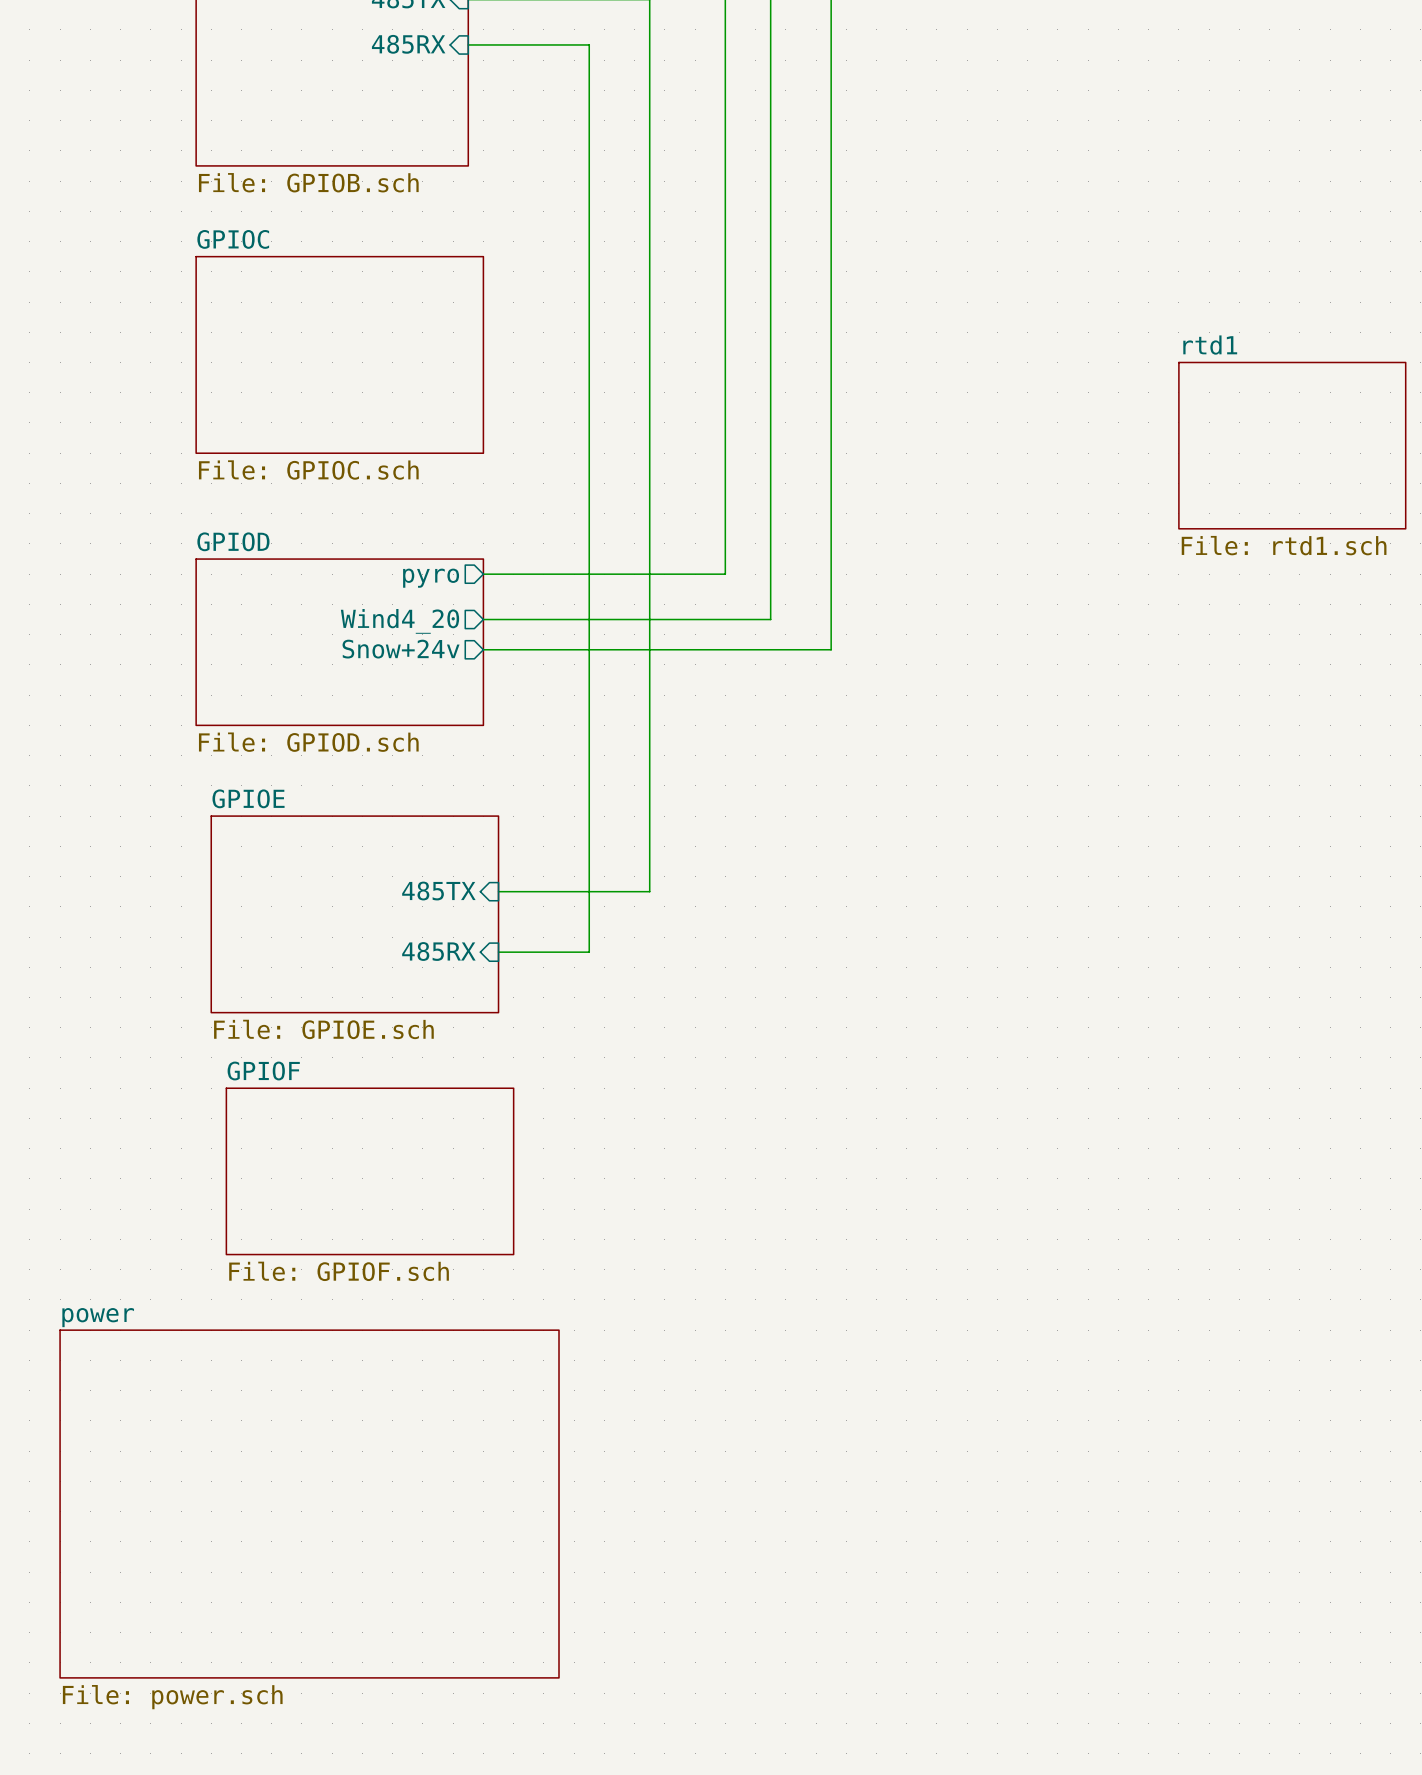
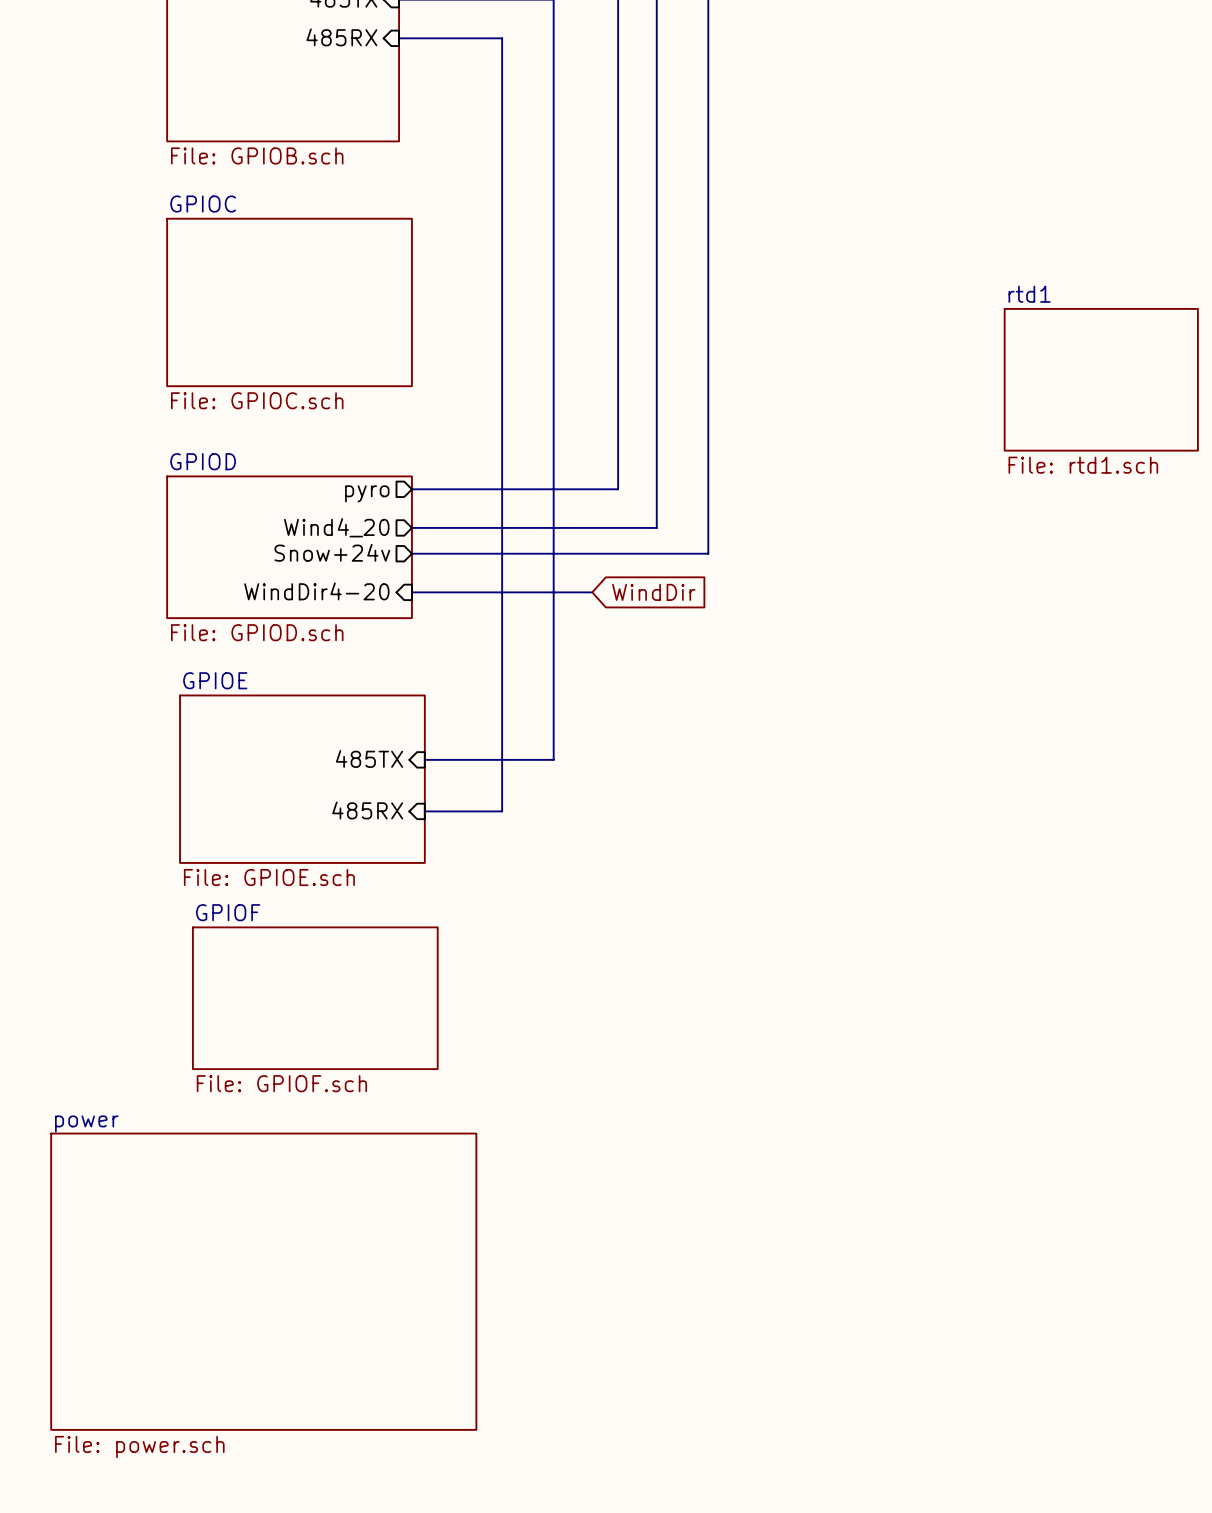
sheet pin: none -> WindDir4-20 (316, 591)
global label: none -> WindDir (653, 592)
wire: none -> (411, 592) (592, 592)

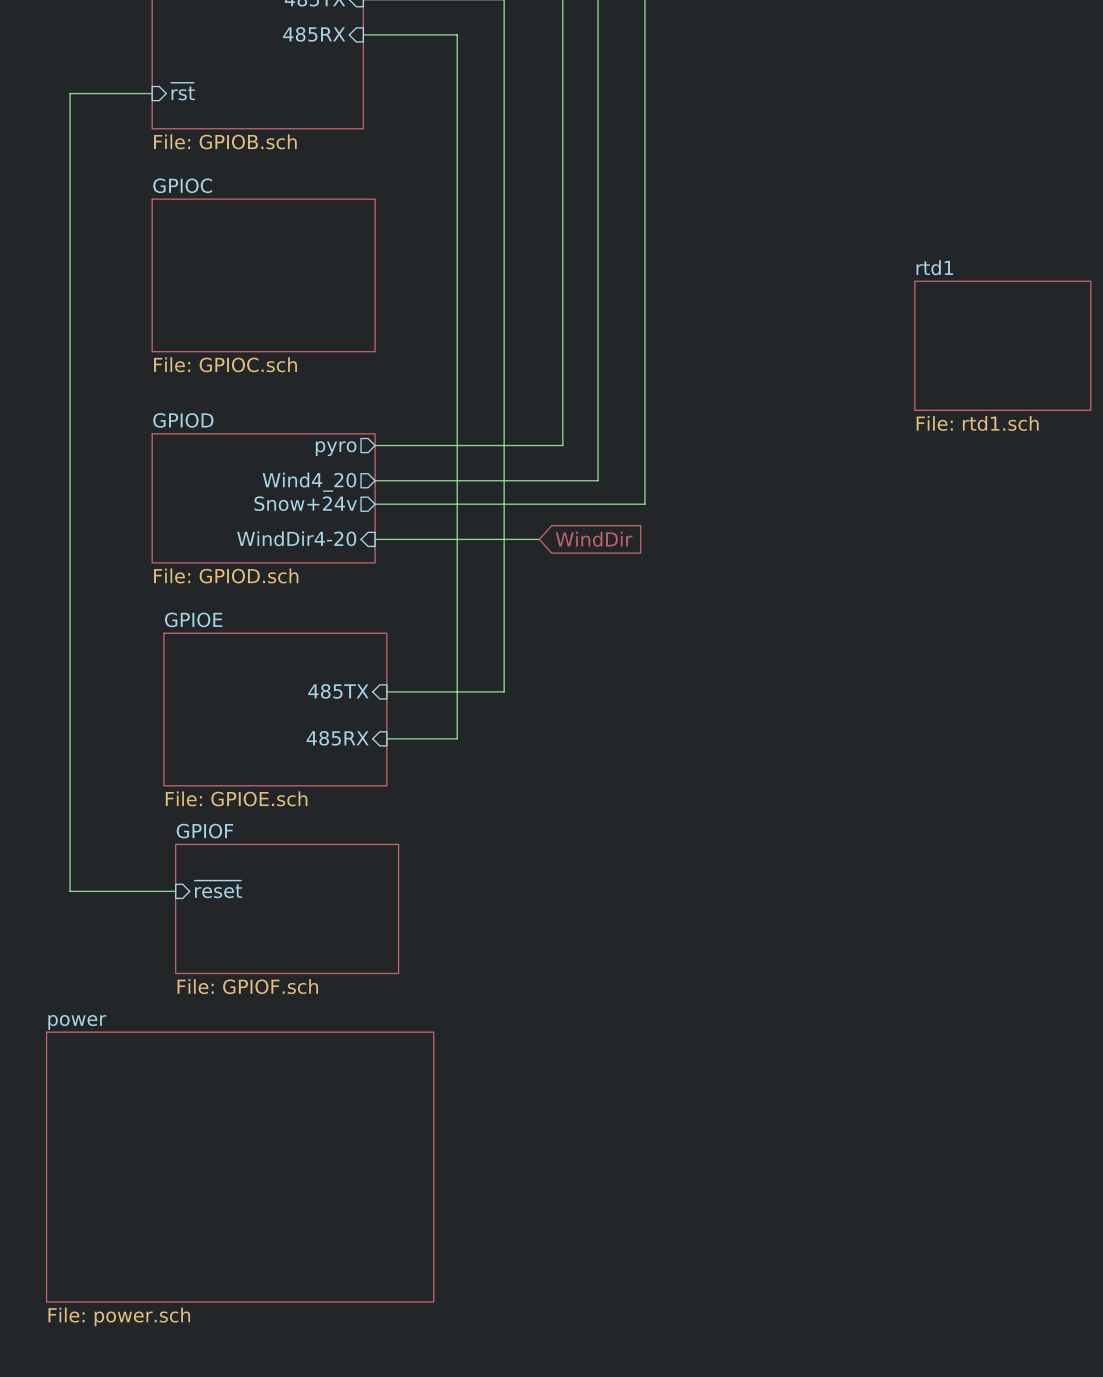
sheet pin: none -> ~{rst} (183, 91)
wire: none -> (152, 93) (70, 93) (70, 891) (175, 891)
sheet pin: none -> ~{reset} (218, 889)

